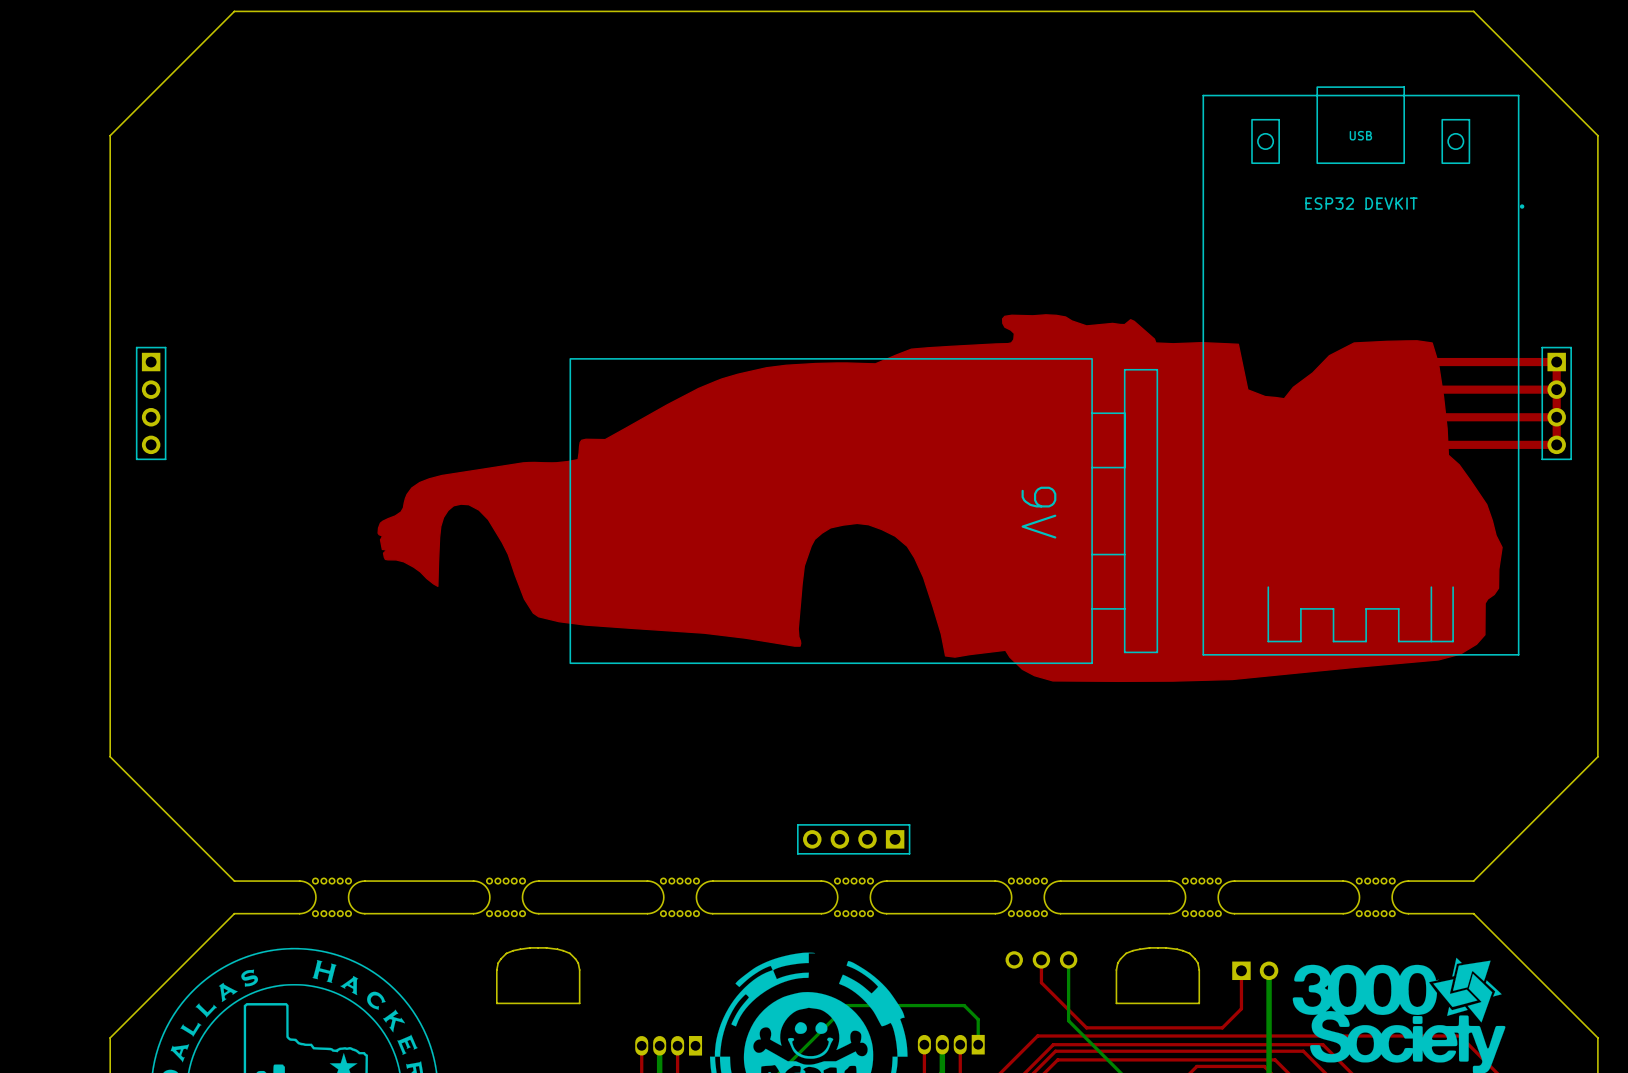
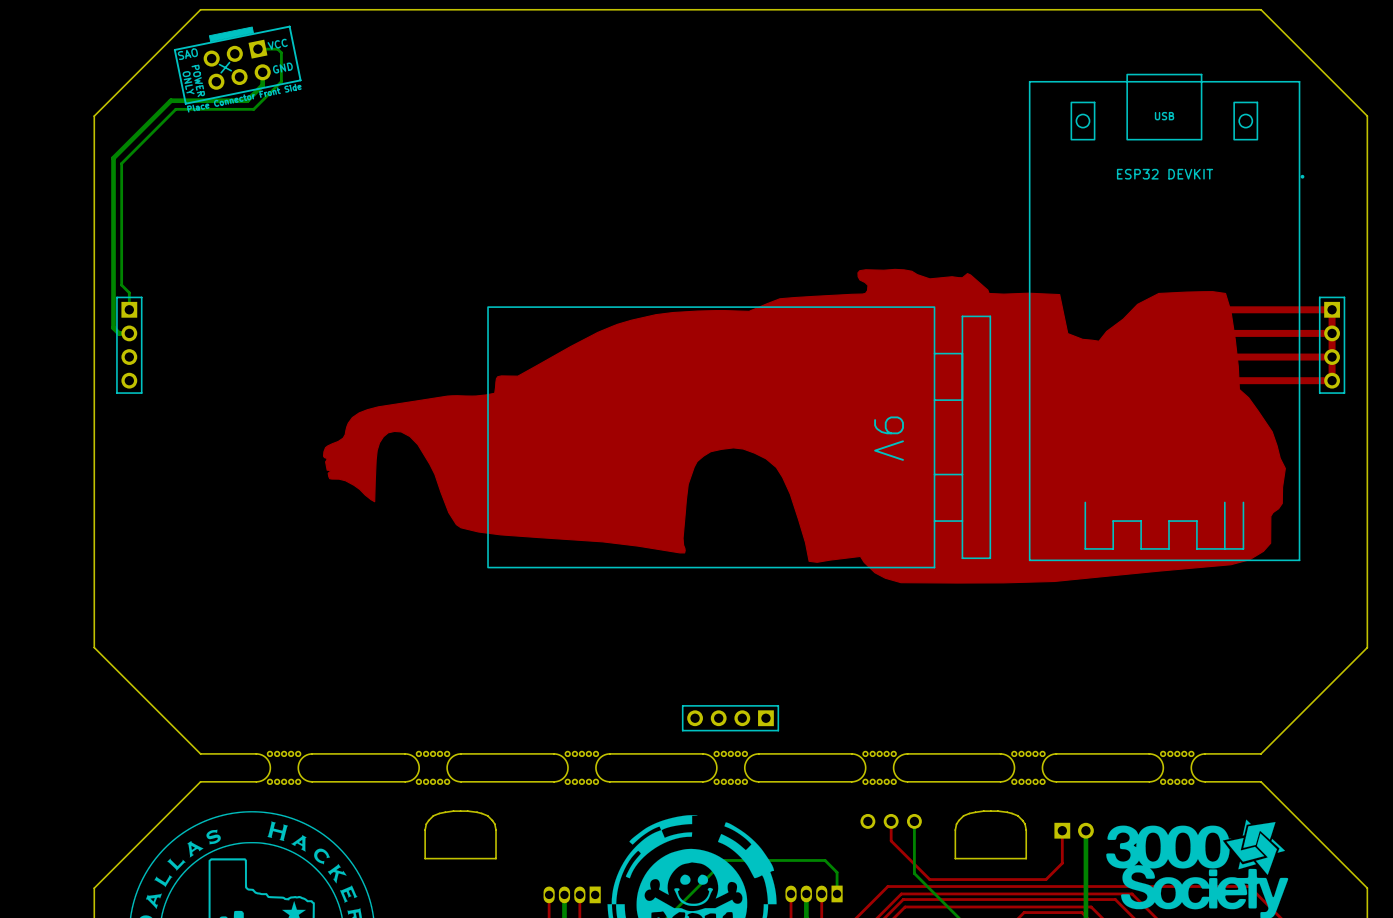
bottom track: none -> (257, 49) (277, 49) (281, 52) (281, 81) (253, 109) (175, 109) (121, 163) (121, 285) (129, 292) (129, 309)
part: none -> (237, 65)
bottom track: none -> (262, 72) (262, 85) (247, 100) (170, 100) (113, 158) (113, 327) (119, 333) (129, 333)

